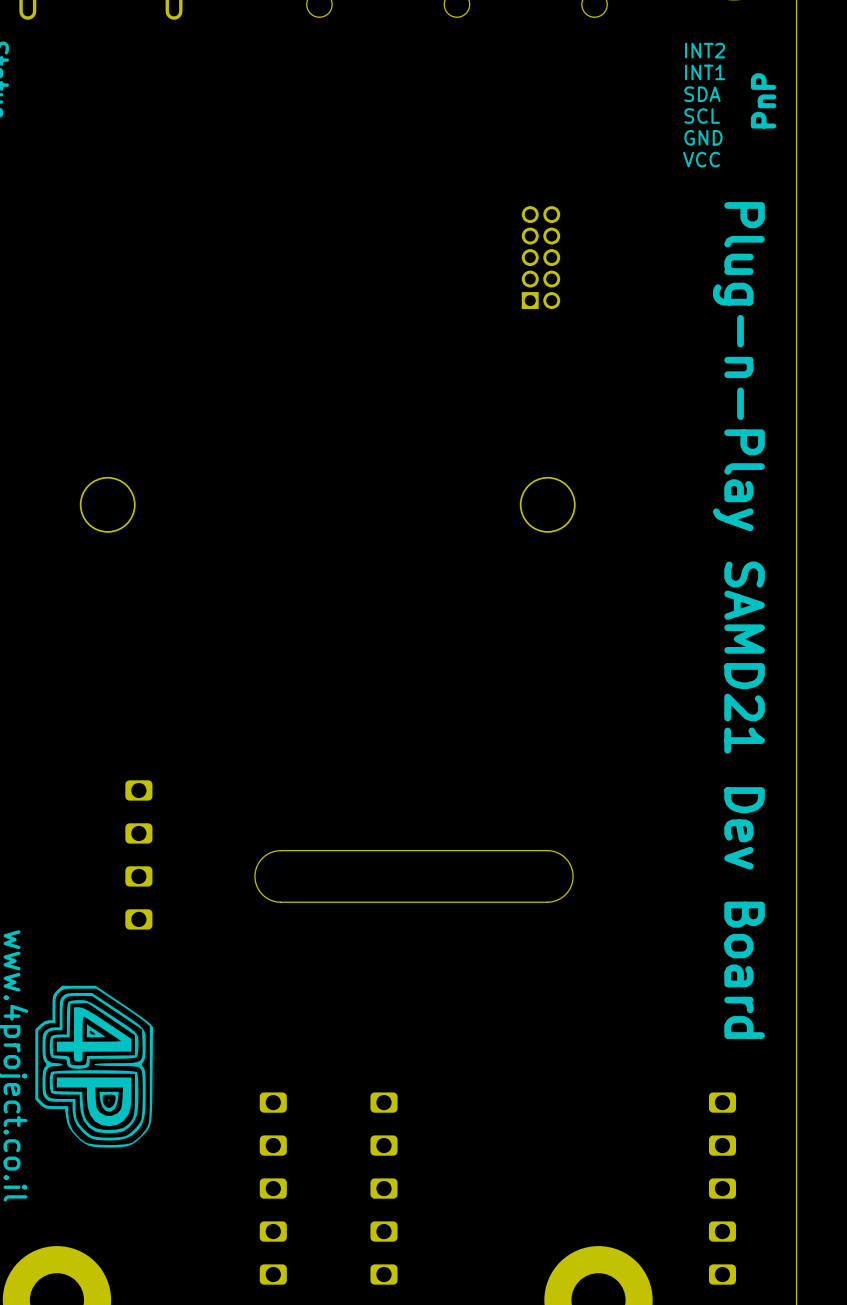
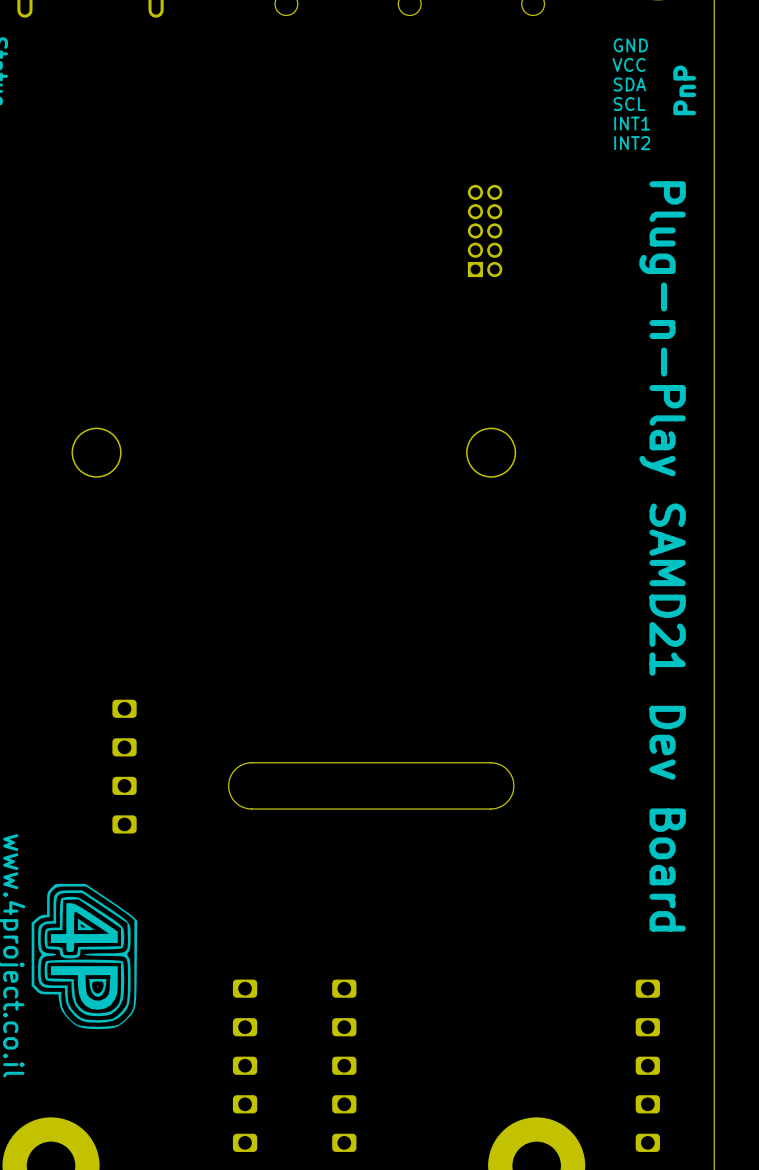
text: INT2 (705, 50) -> GND (630, 45)
text: INT1 (705, 72) -> VCC (629, 64)
text: GND (703, 137) -> INT1 (632, 123)
text: VCC (701, 159) -> INT2 (632, 143)

